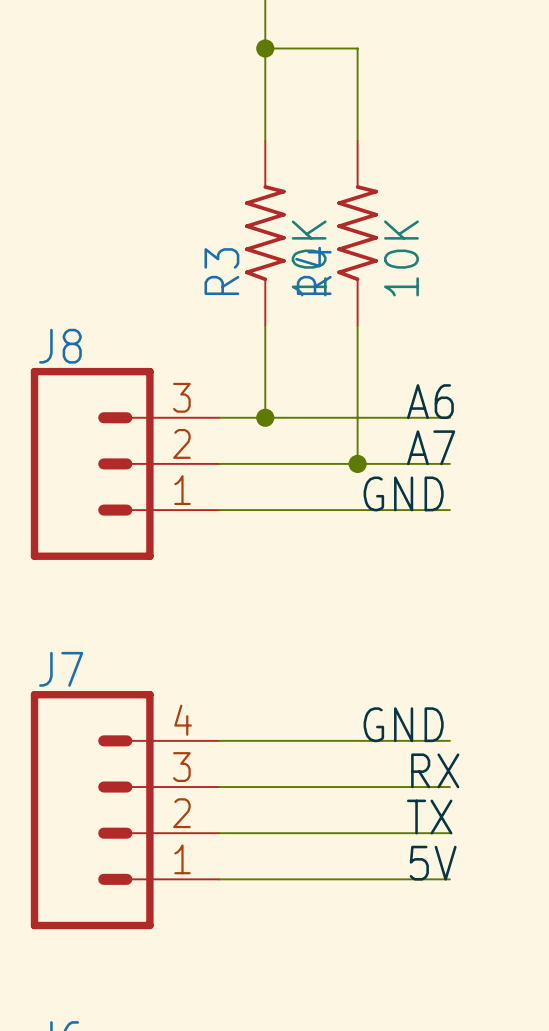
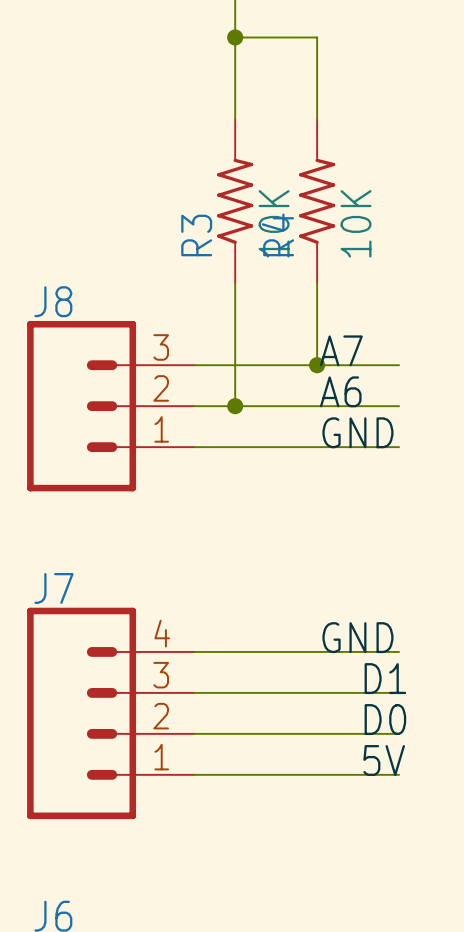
label position: A6 (430, 401) -> A6 (340, 391)
junction: (265, 417) -> none
wire: (357, 417) (357, 463) -> (235, 365) (235, 406)
junction: none -> (317, 365)
label position: A7 (431, 447) -> A7 (341, 350)
junction: none -> (235, 406)
junction: (357, 463) -> none
label: RX (435, 770) -> D1 (385, 678)
label: TX (429, 817) -> D0 (385, 719)

